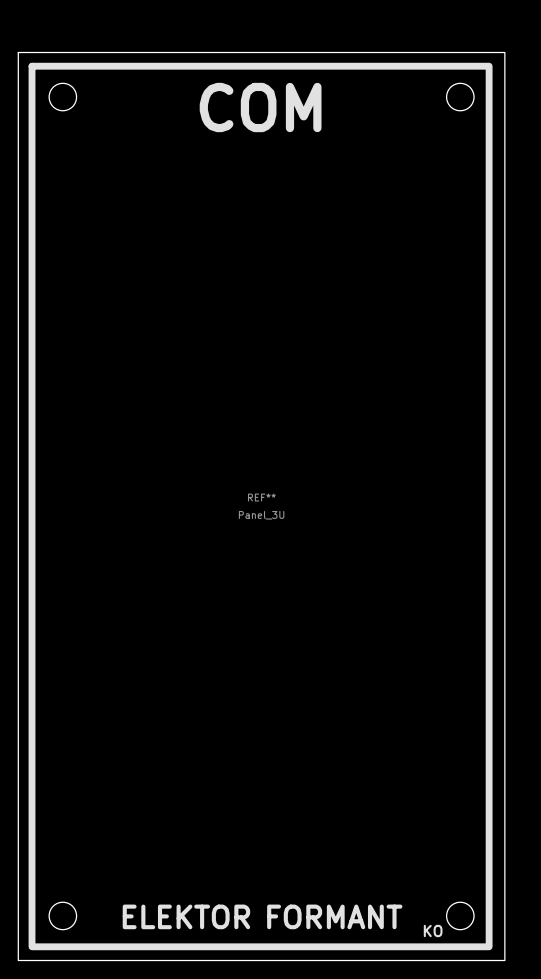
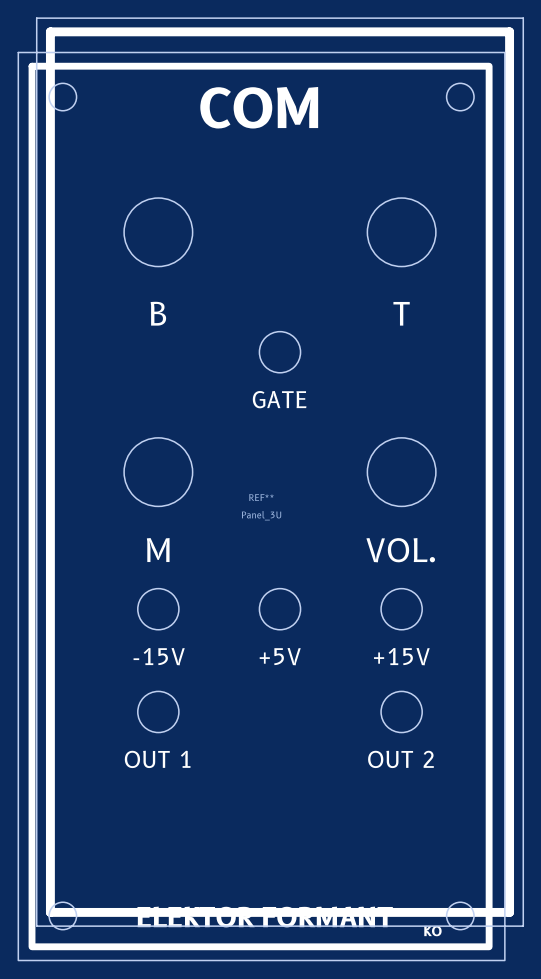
board edge: none -> (36, 18) (523, 18) (523, 926) (36, 926) (36, 18)
line: none -> (50, 31) (509, 31) (509, 912) (50, 912) (50, 31)
round board edge: none -> [123, 197, 193, 267]
round board edge: none -> [367, 197, 437, 267]
text: none -> B (158, 313)
text: none -> T (401, 313)
round board edge: none -> [259, 331, 301, 373]
text: none -> GATE (279, 399)
round board edge: none -> [123, 437, 193, 507]
round board edge: none -> [367, 437, 437, 507]
text: none -> M (158, 550)
text: none -> VOL. (400, 550)
round board edge: none -> [137, 588, 180, 630]
round board edge: none -> [259, 588, 301, 630]
round board edge: none -> [380, 588, 423, 630]
text: none -> -15V (159, 656)
text: none -> +5V (280, 656)
text: none -> +15V (401, 656)
round board edge: none -> [137, 691, 180, 733]
round board edge: none -> [380, 691, 423, 733]
text: none -> OUT 1 (157, 759)
text: none -> OUT 2 (400, 759)

